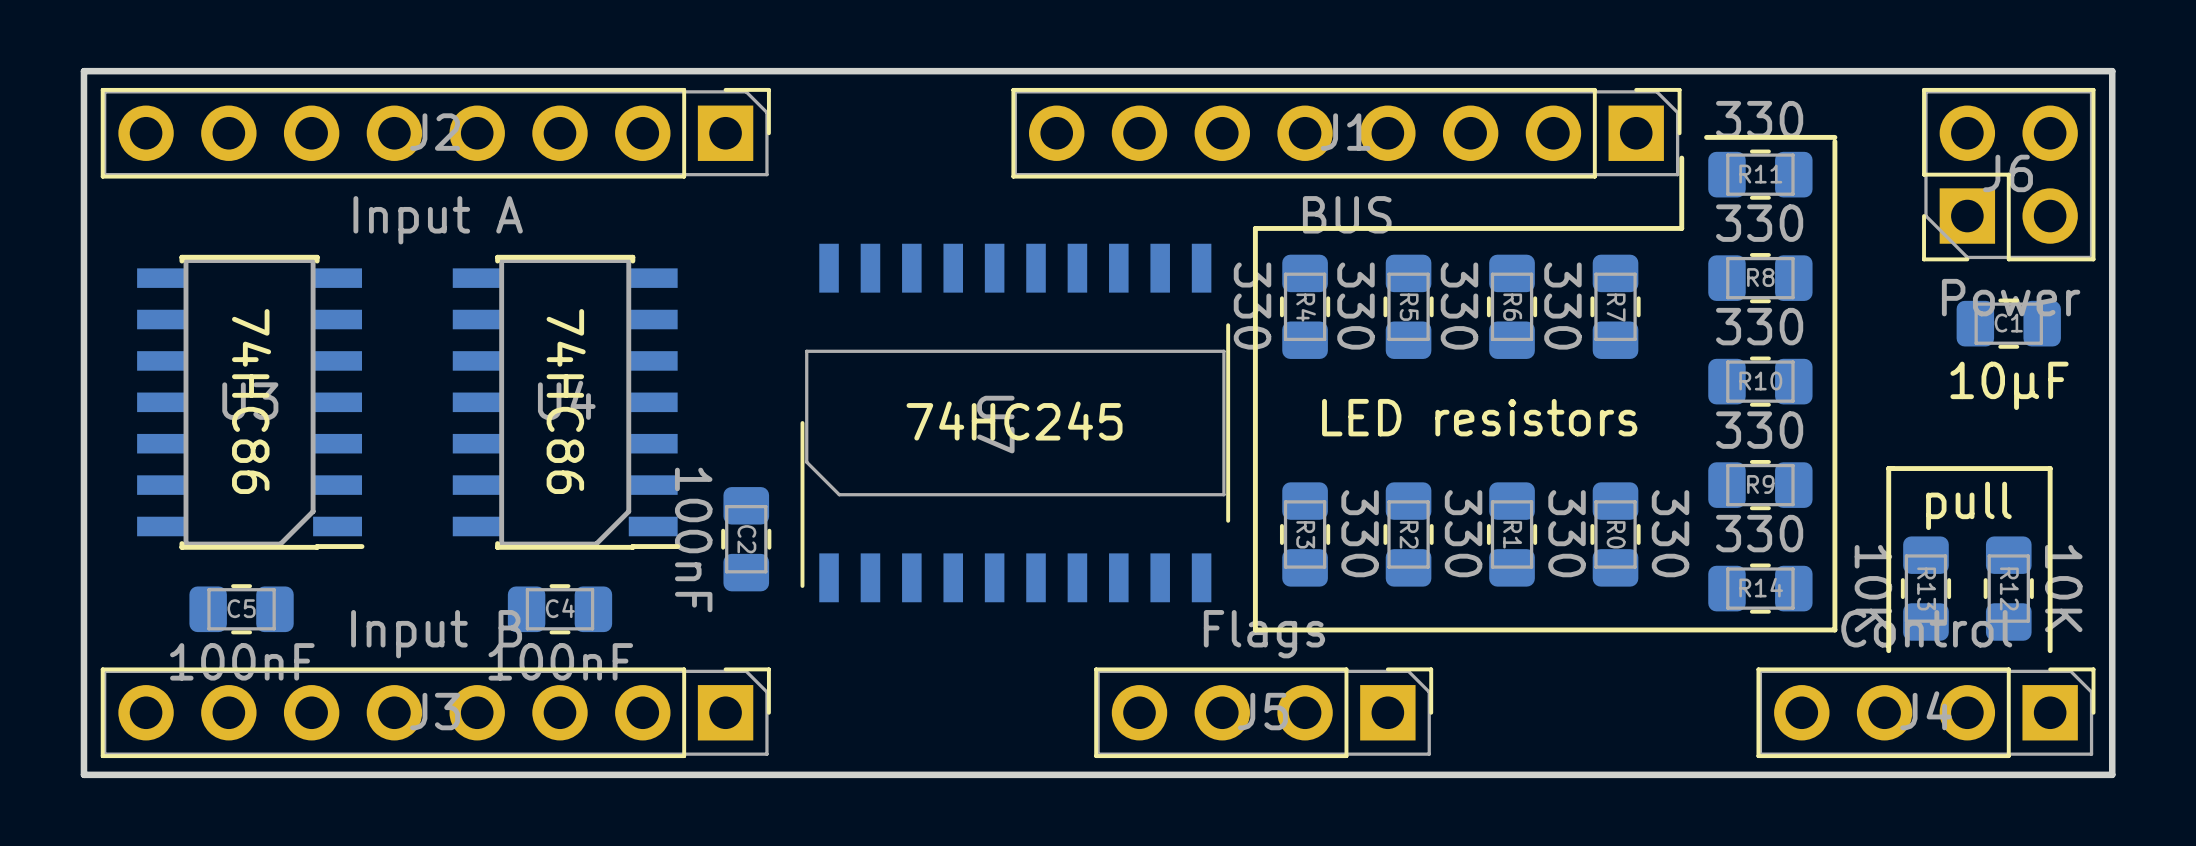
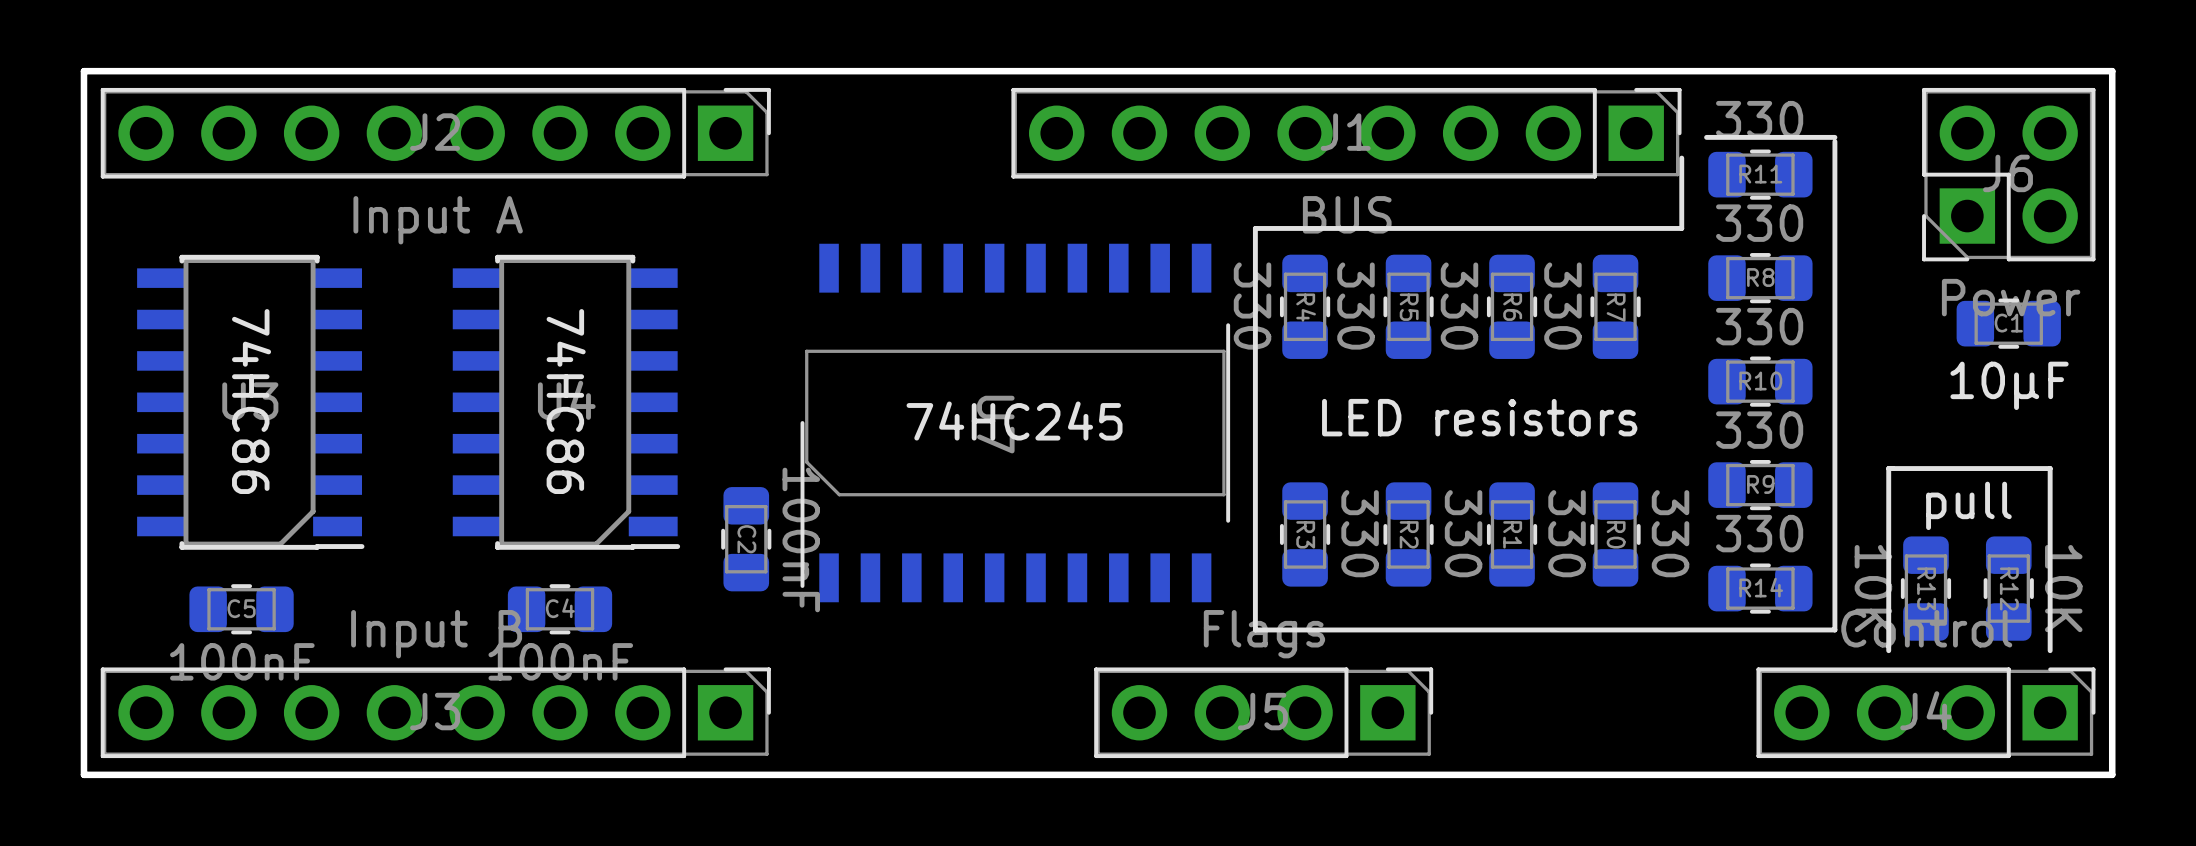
C2 value position: 100nF (693, 539) -> 100nF (801, 539)

